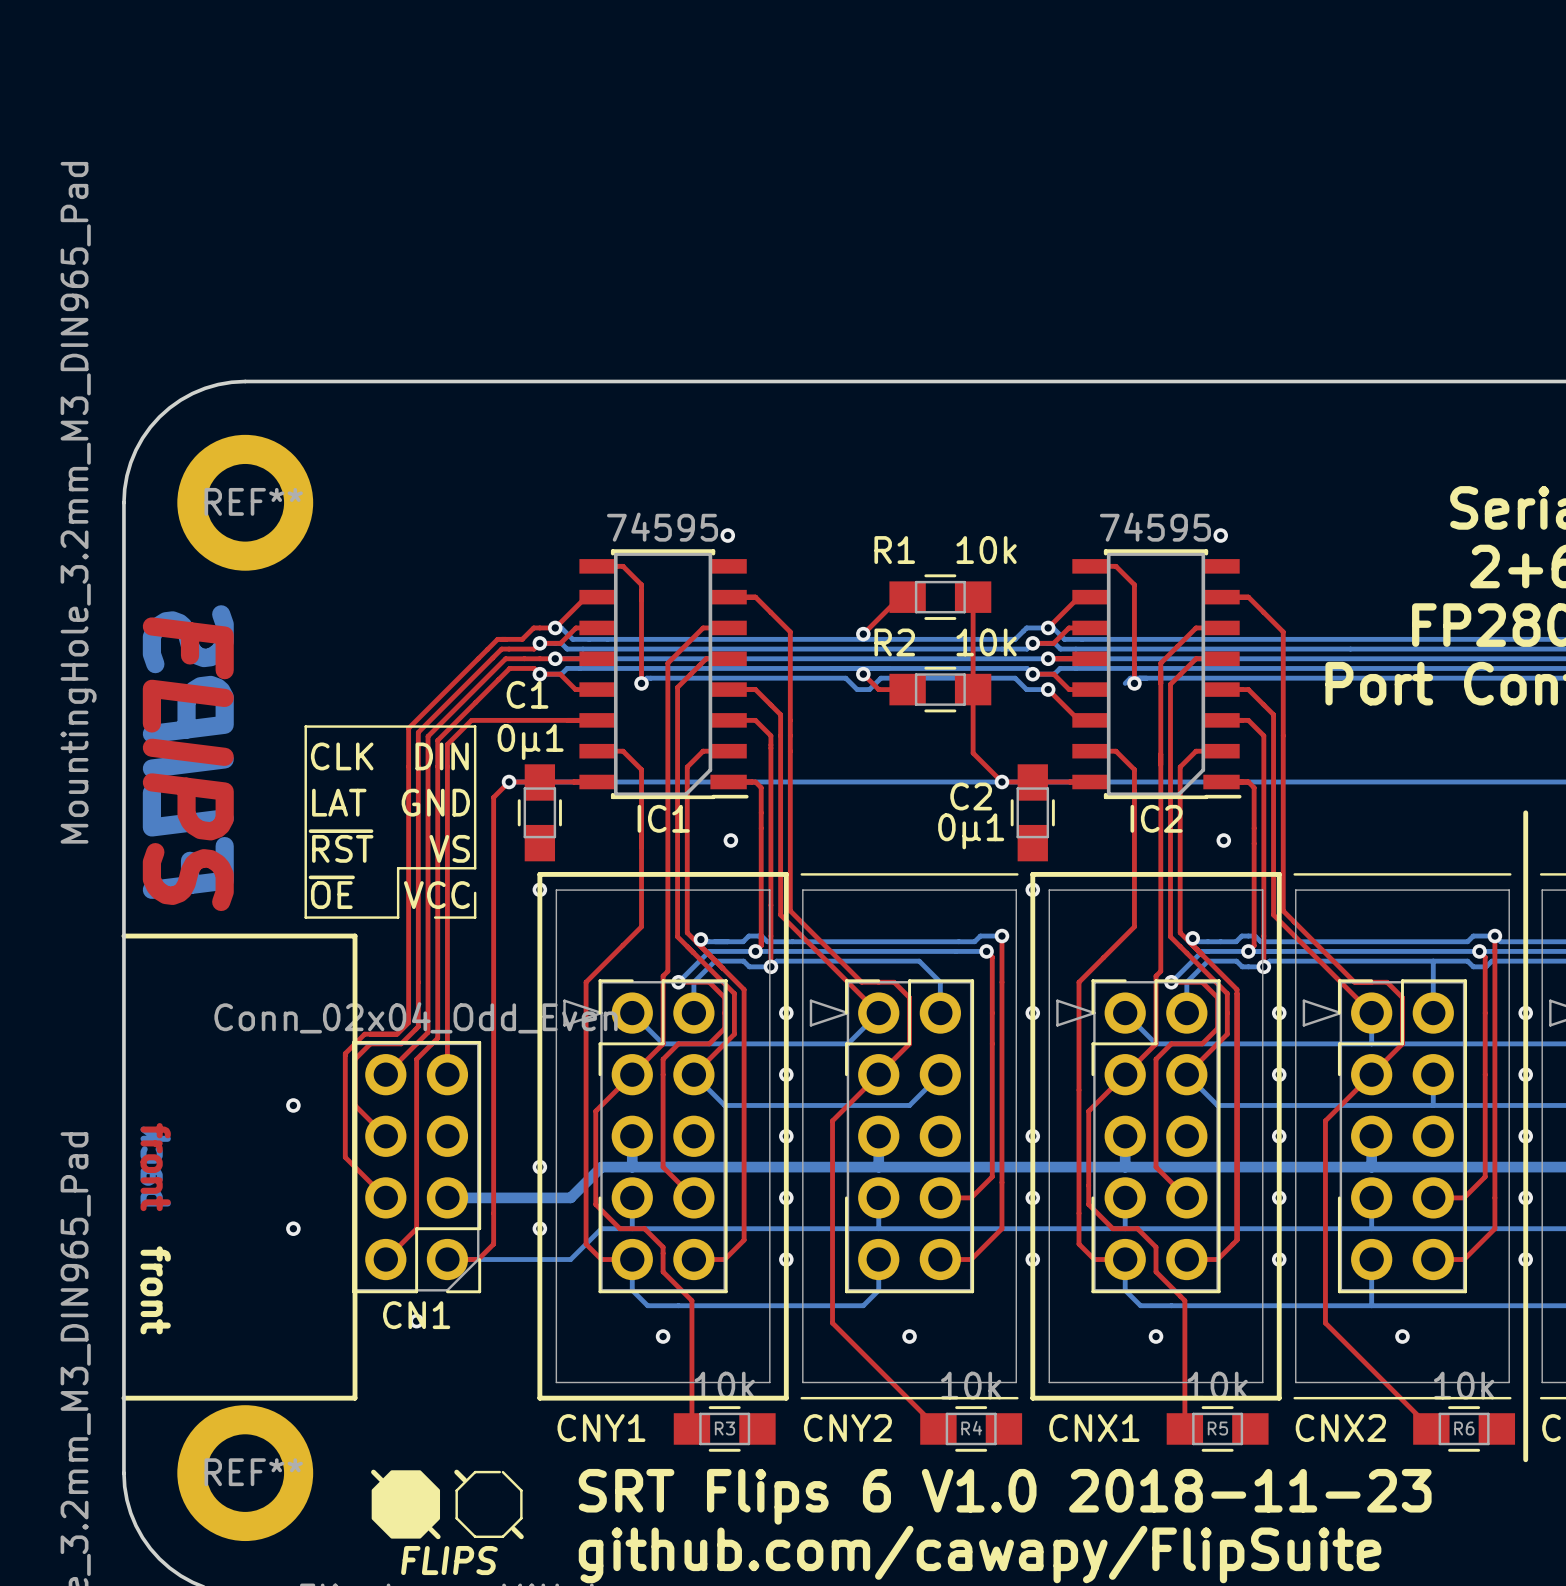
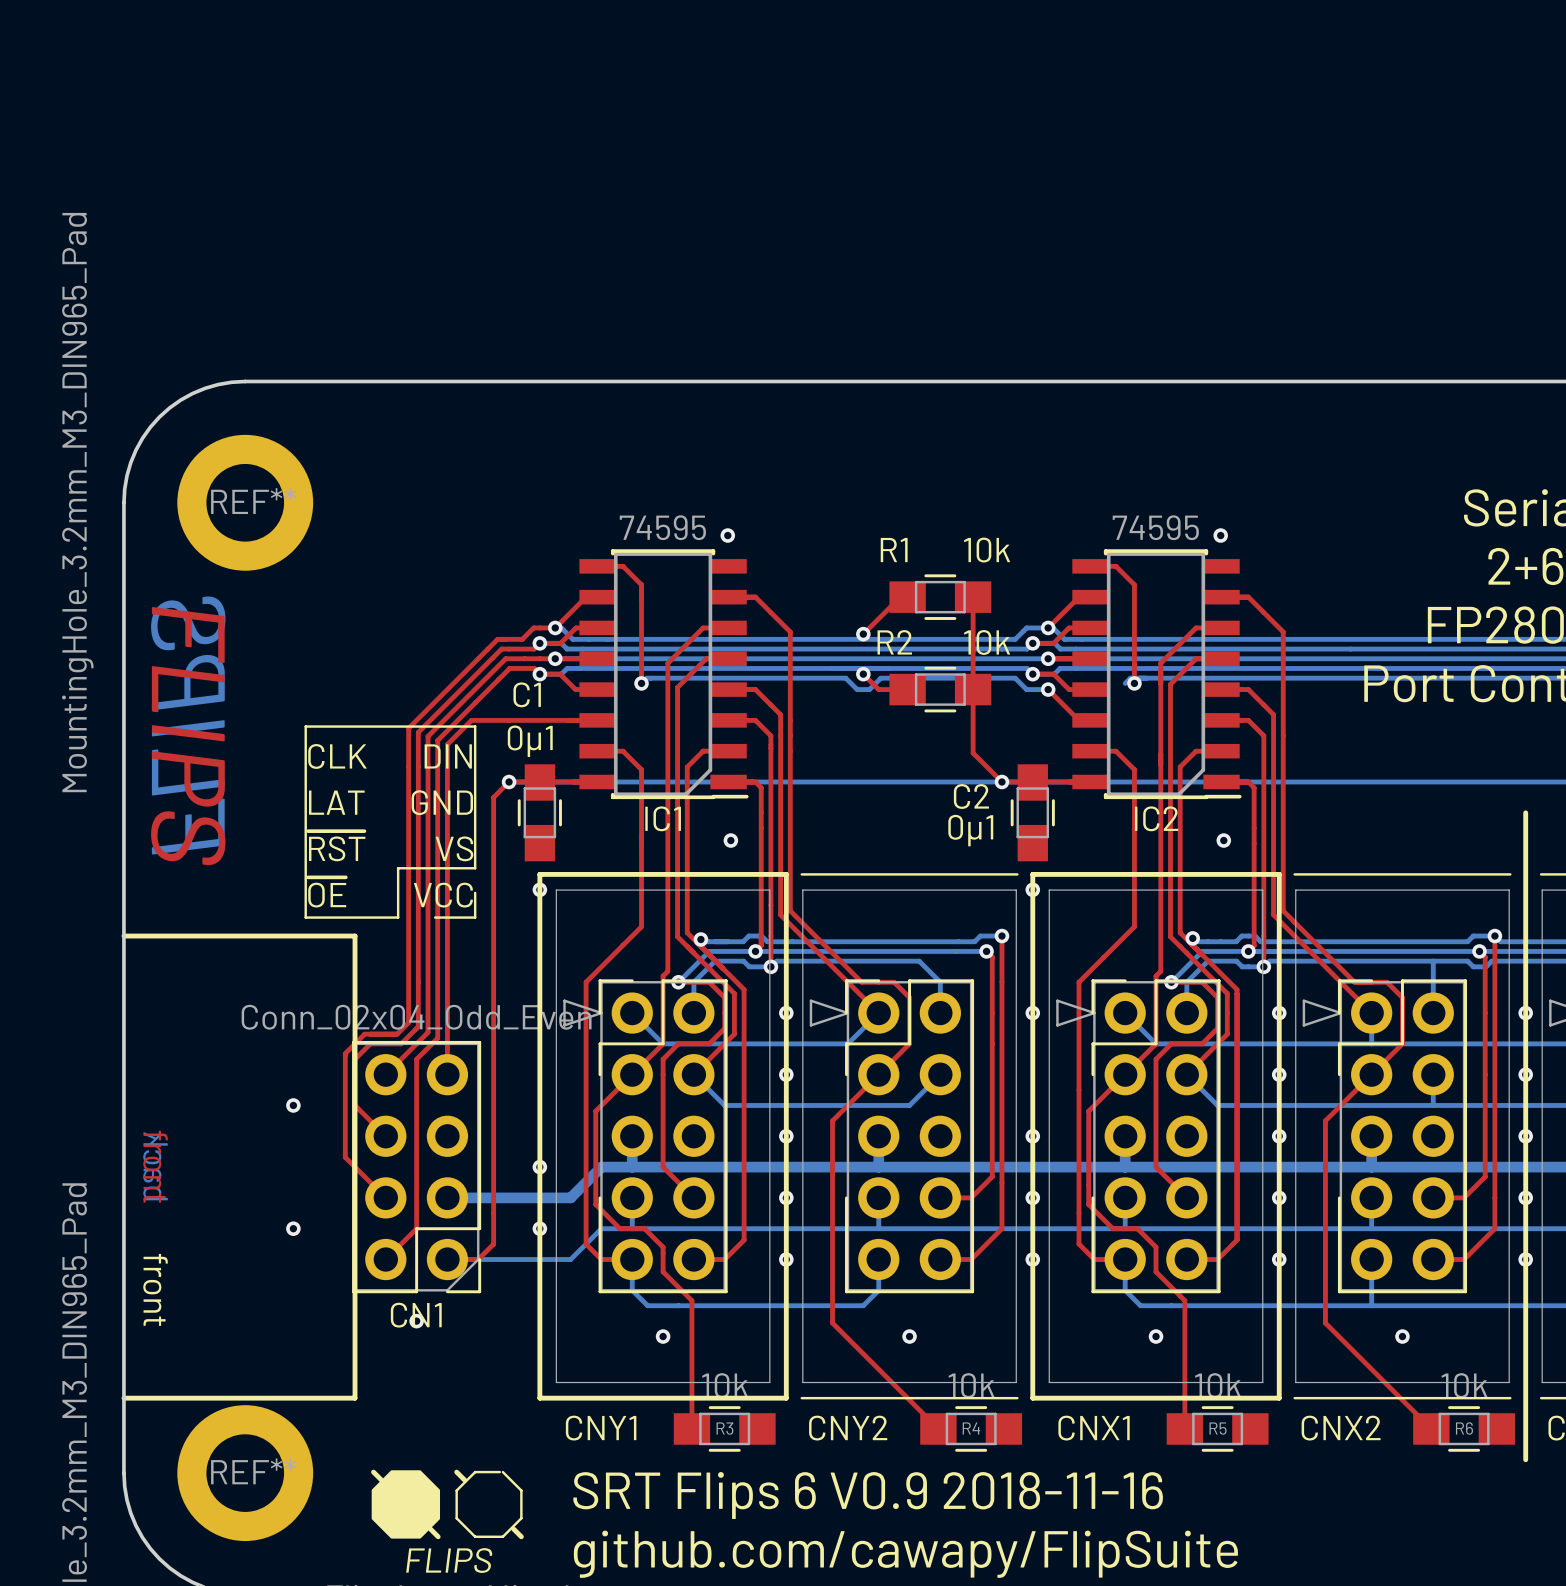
text: SRT Flips 6 V1.0 2018-11-23 (1005, 1496) -> SRT Flips 6 V0.9 2018-11-16 (868, 1495)

